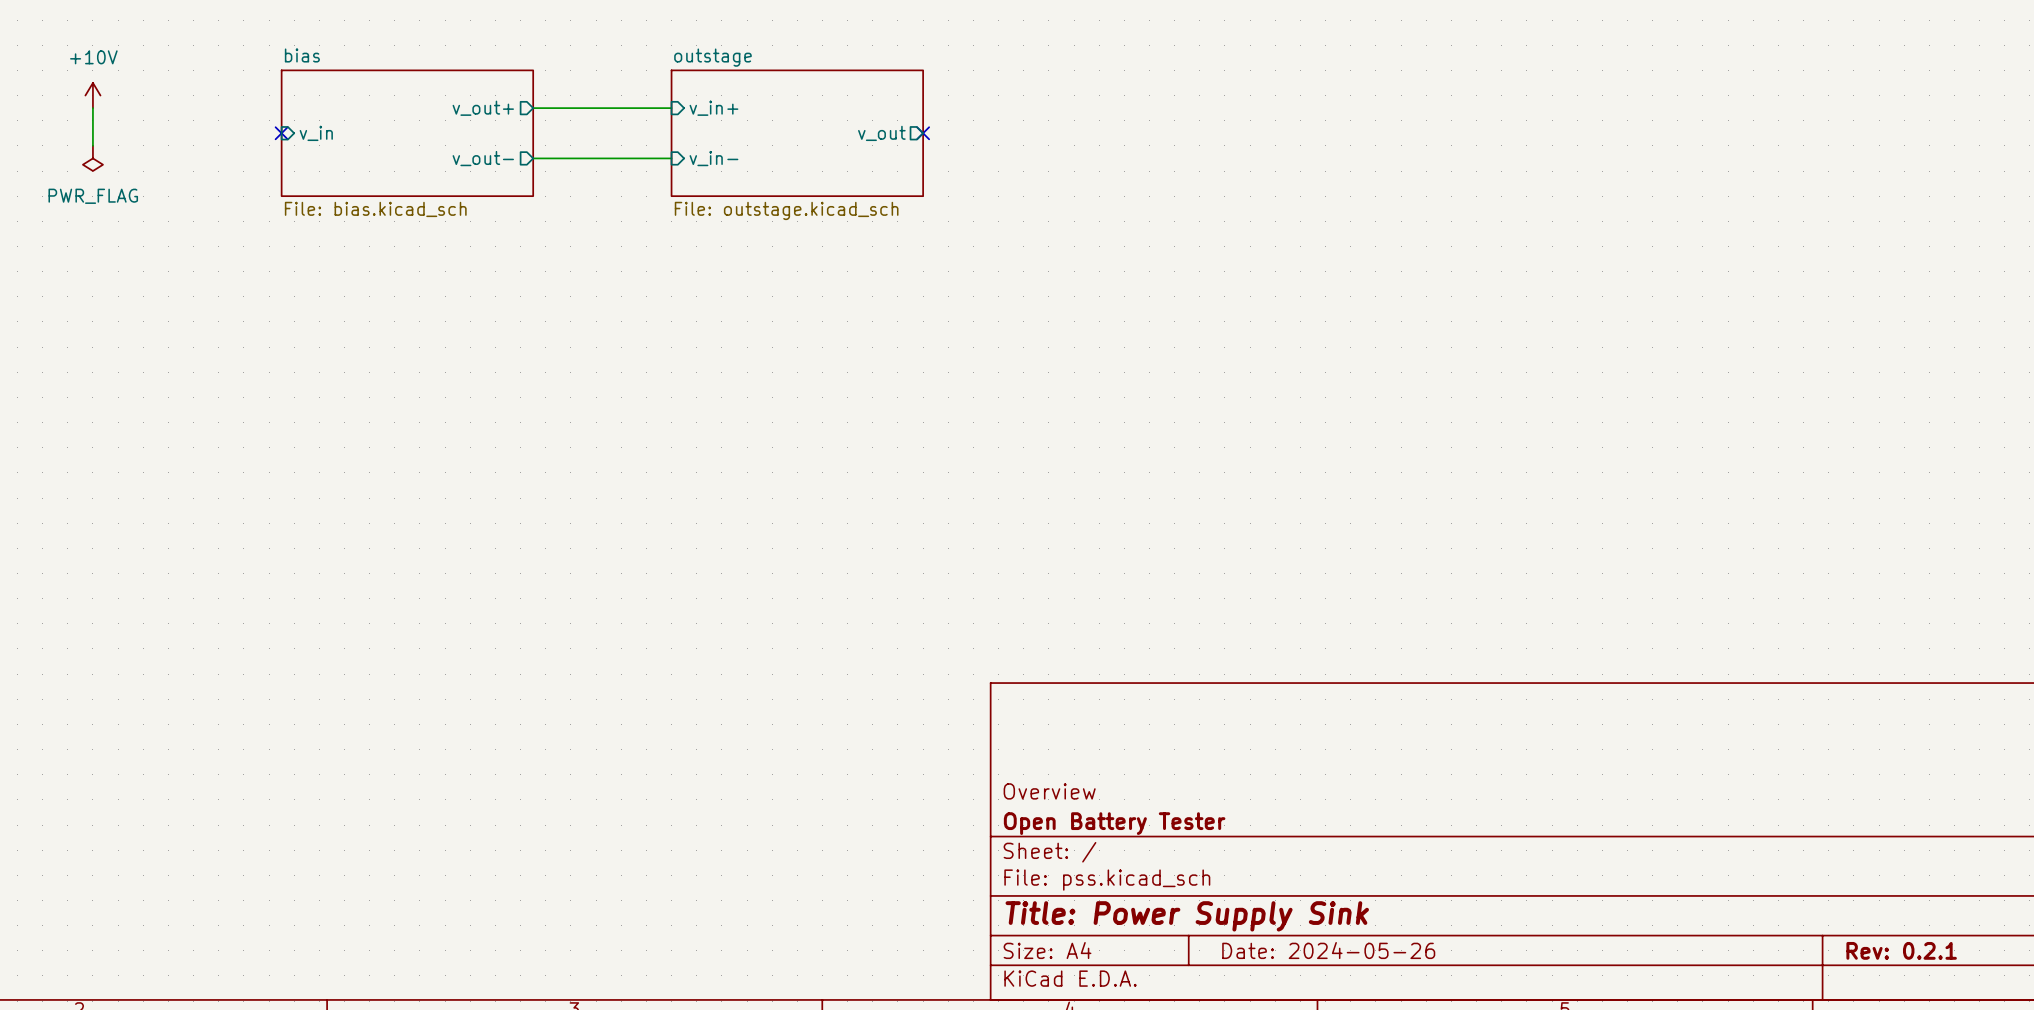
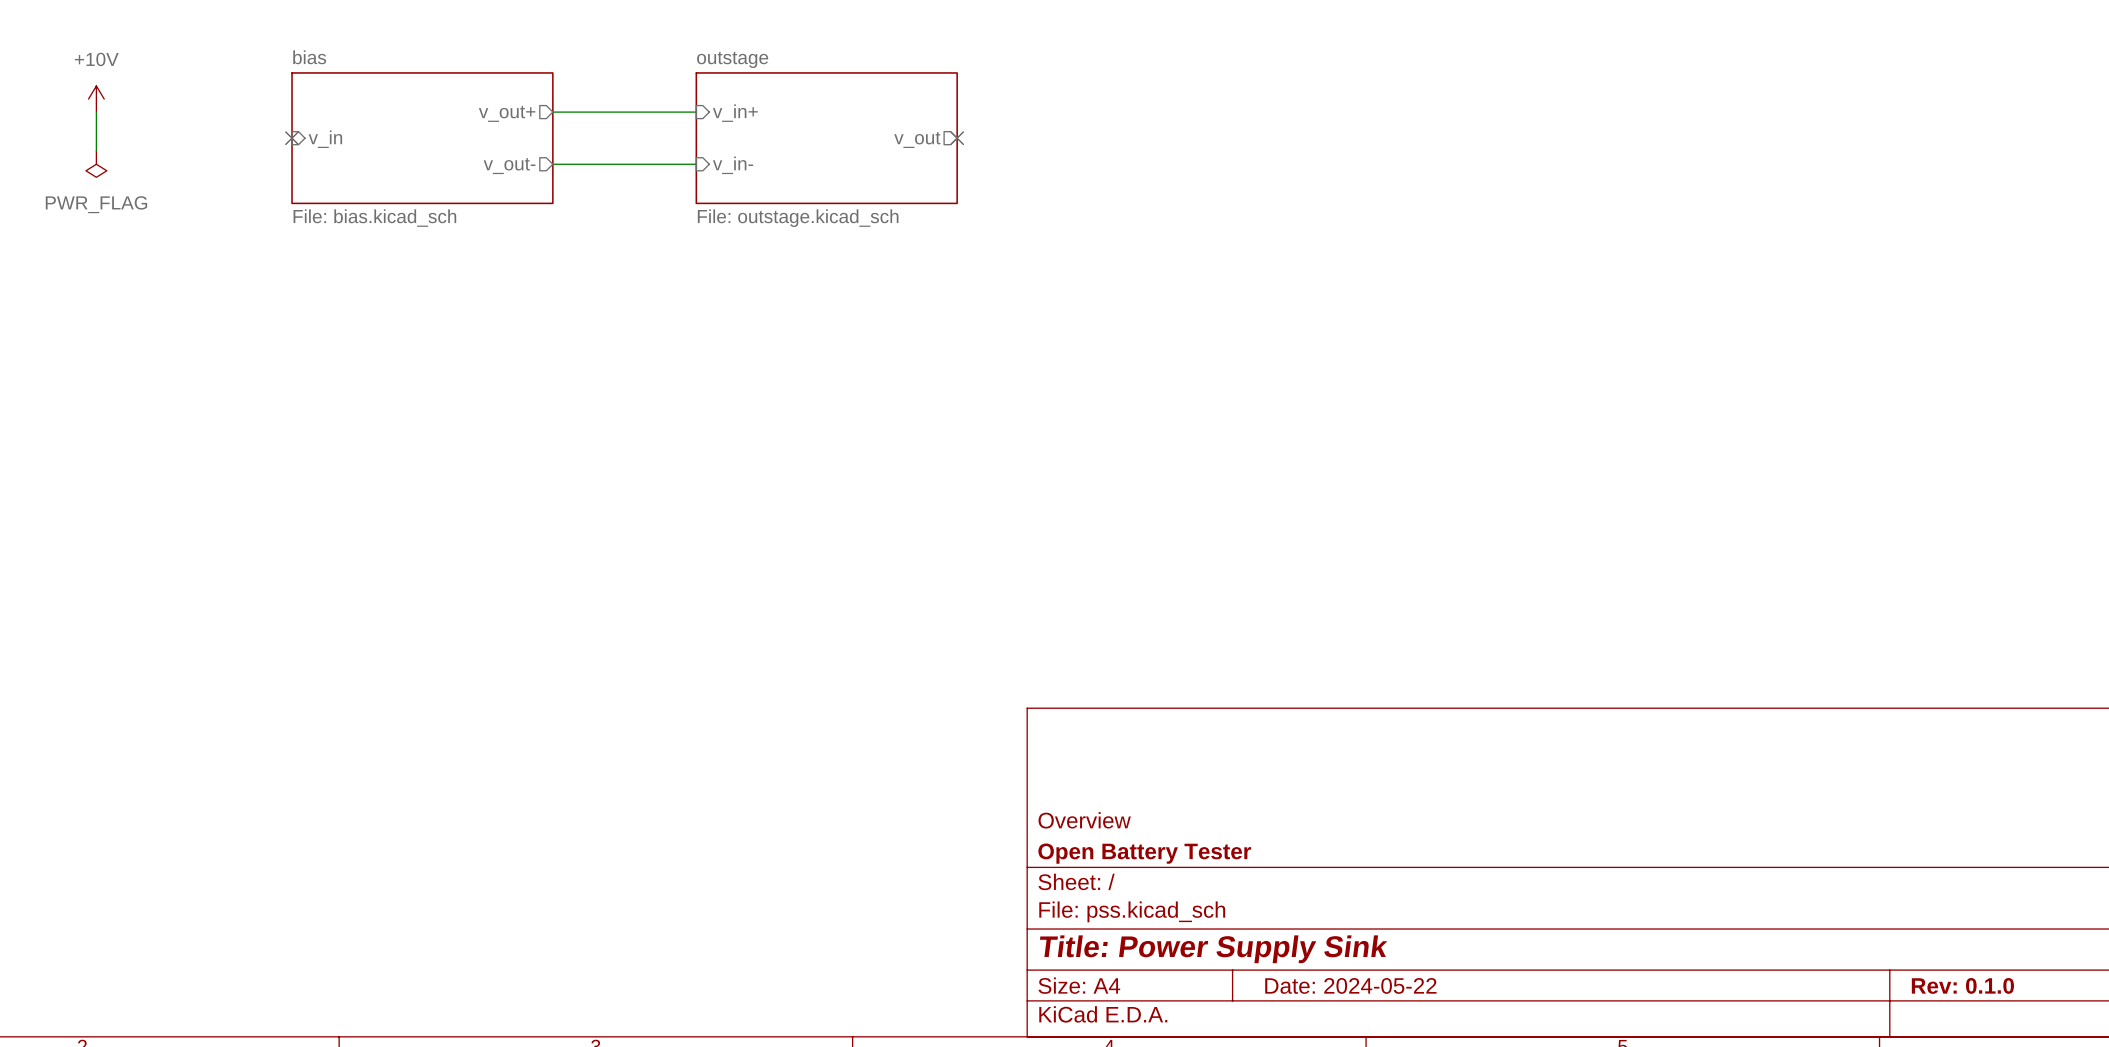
title block: Date: 2024-05-26 (1328, 950) -> Date: 2024-05-22 (1350, 985)
title block: Rev: 0.2.1 (1901, 950) -> Rev: 0.1.0 (1962, 985)

